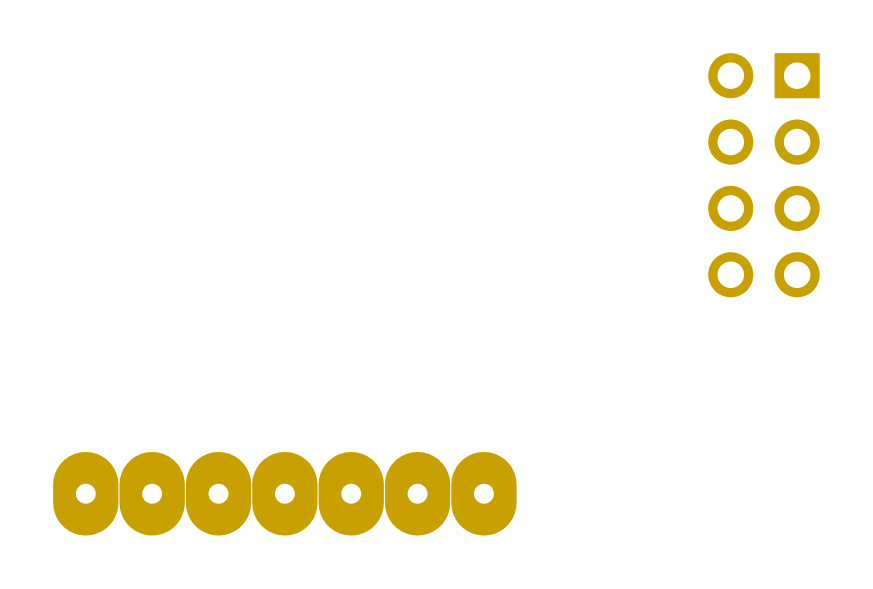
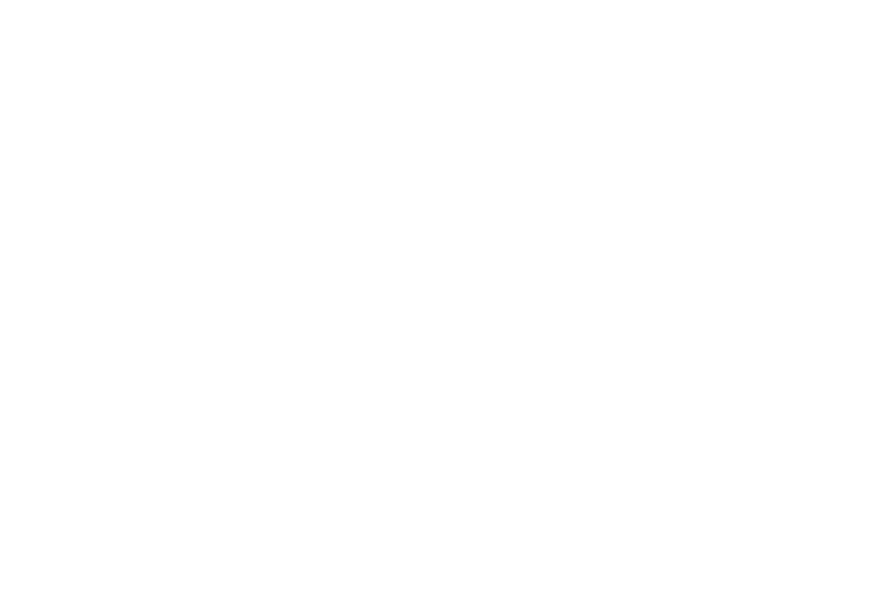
part: (763, 175) -> none
part: (284, 493) -> none

